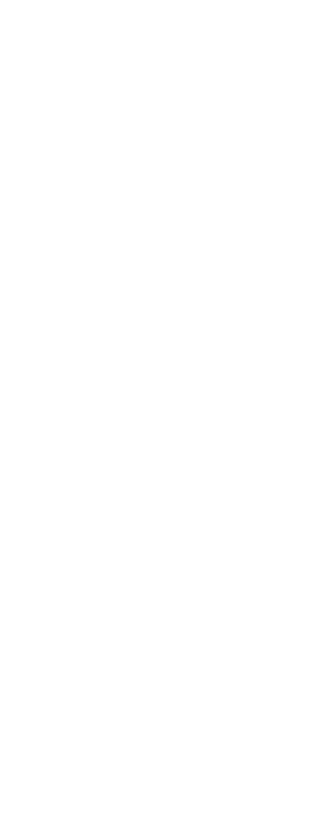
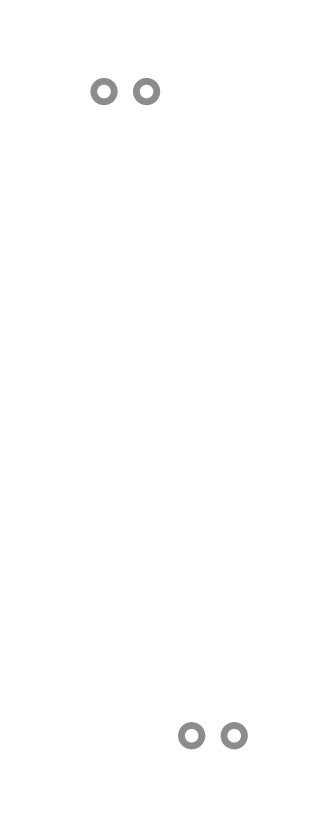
part: none -> (125, 91)
part: none -> (212, 735)

